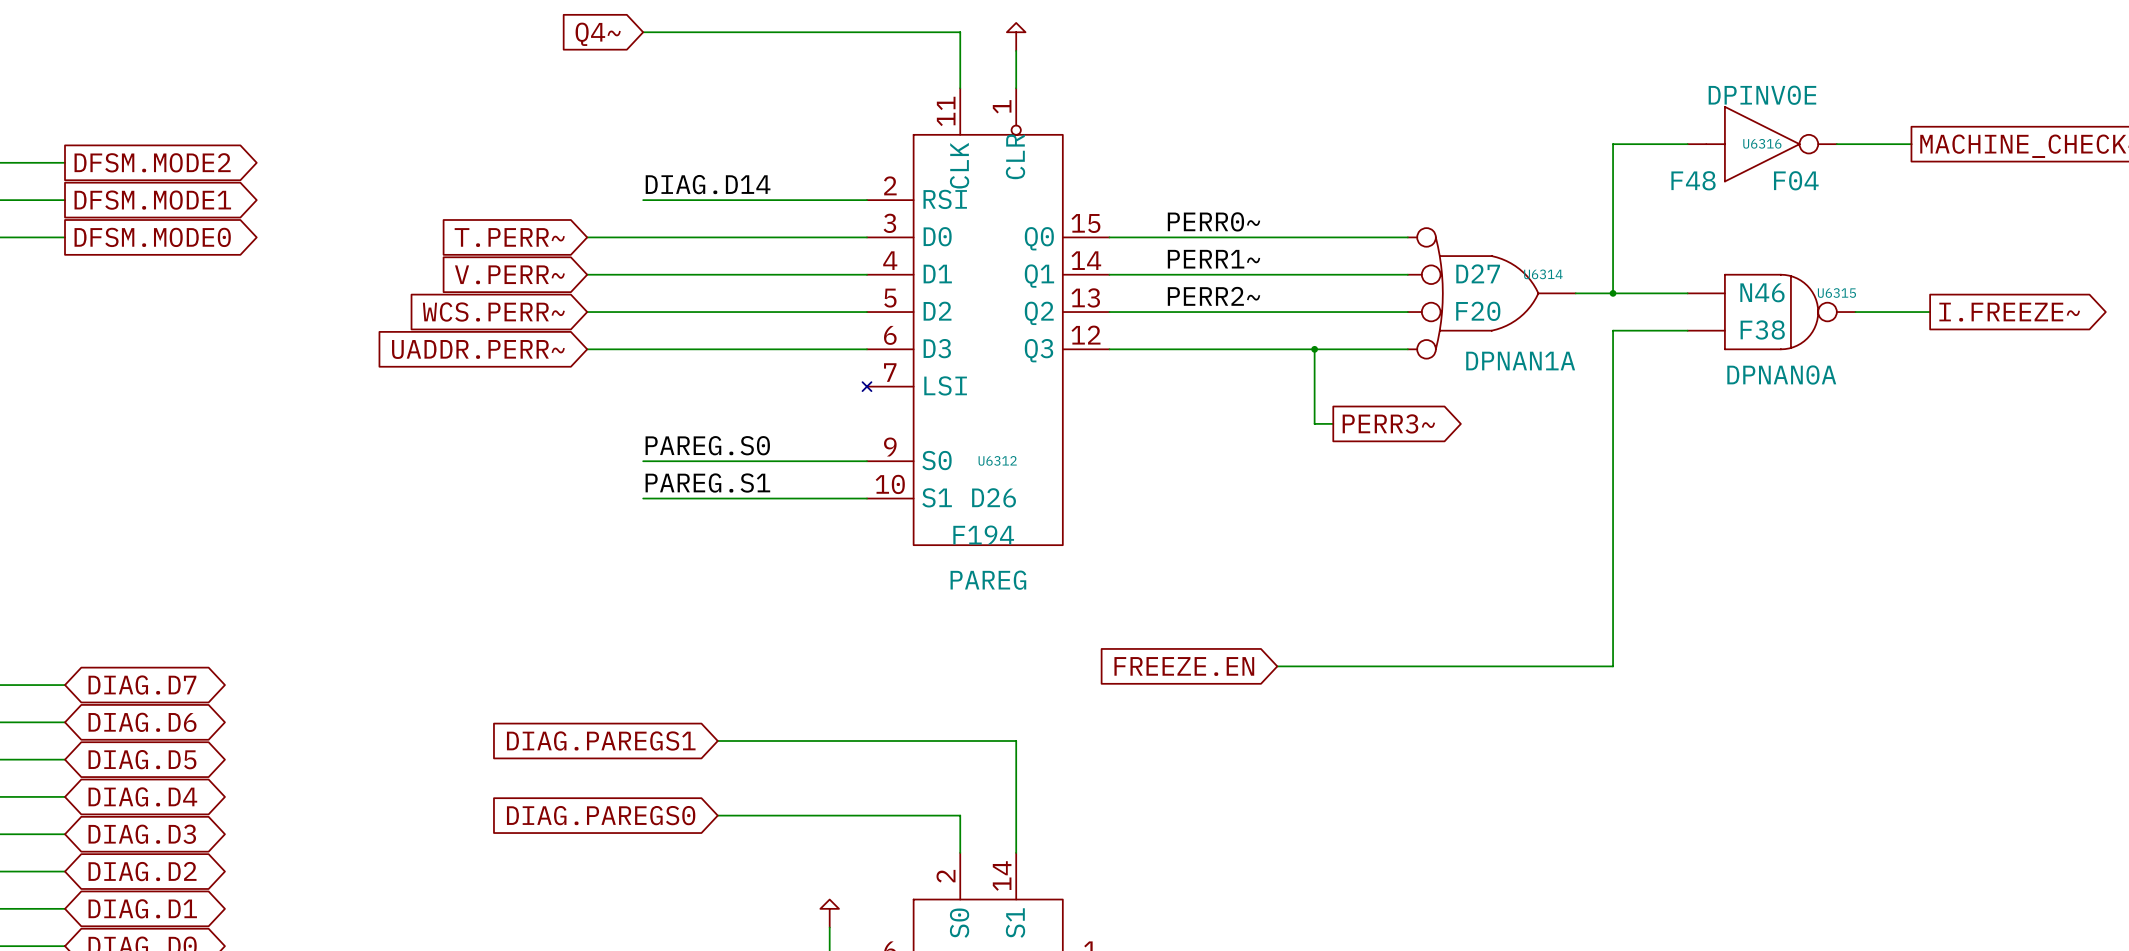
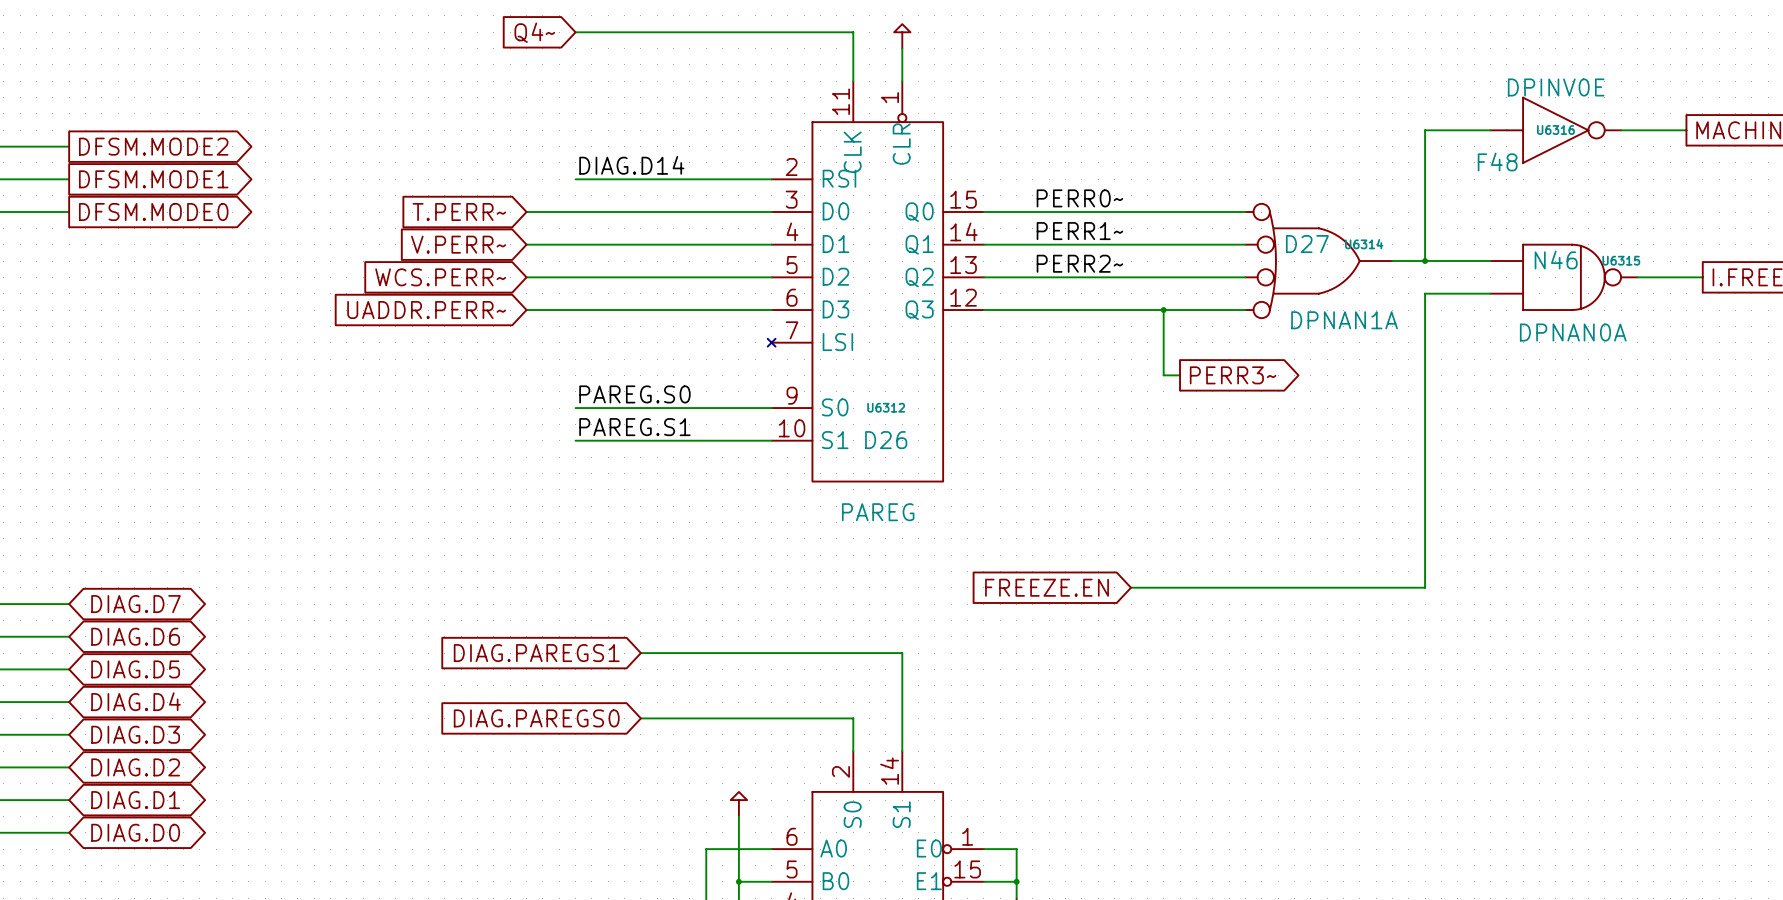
U6316 value: F04 (1796, 180) -> none
U6314 value: F20 (1478, 311) -> none
U6315 value: F38 (1762, 329) -> none
U6312 value: F194 (983, 534) -> none

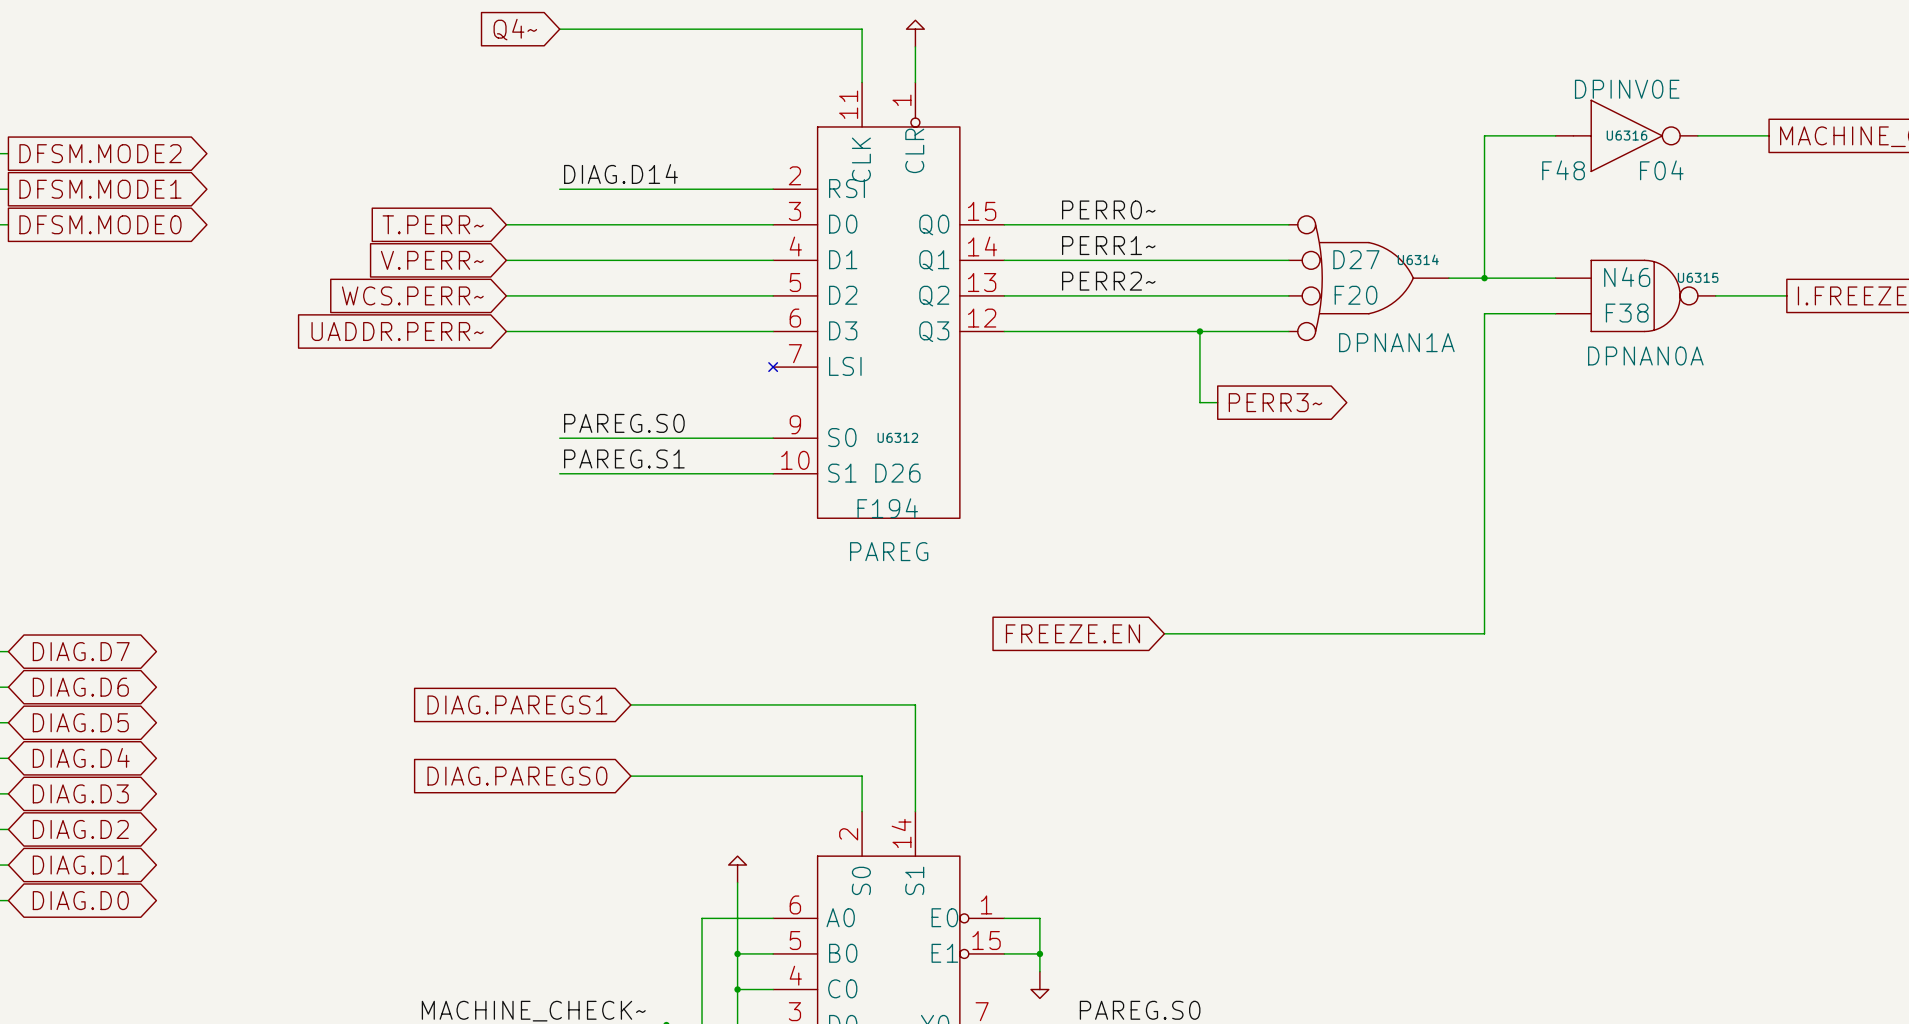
U6316 value: none -> F04 (1661, 170)
U6314 value: none -> F20 (1356, 295)
U6315 value: none -> F38 (1627, 313)
U6312 value: none -> F194 (887, 508)

